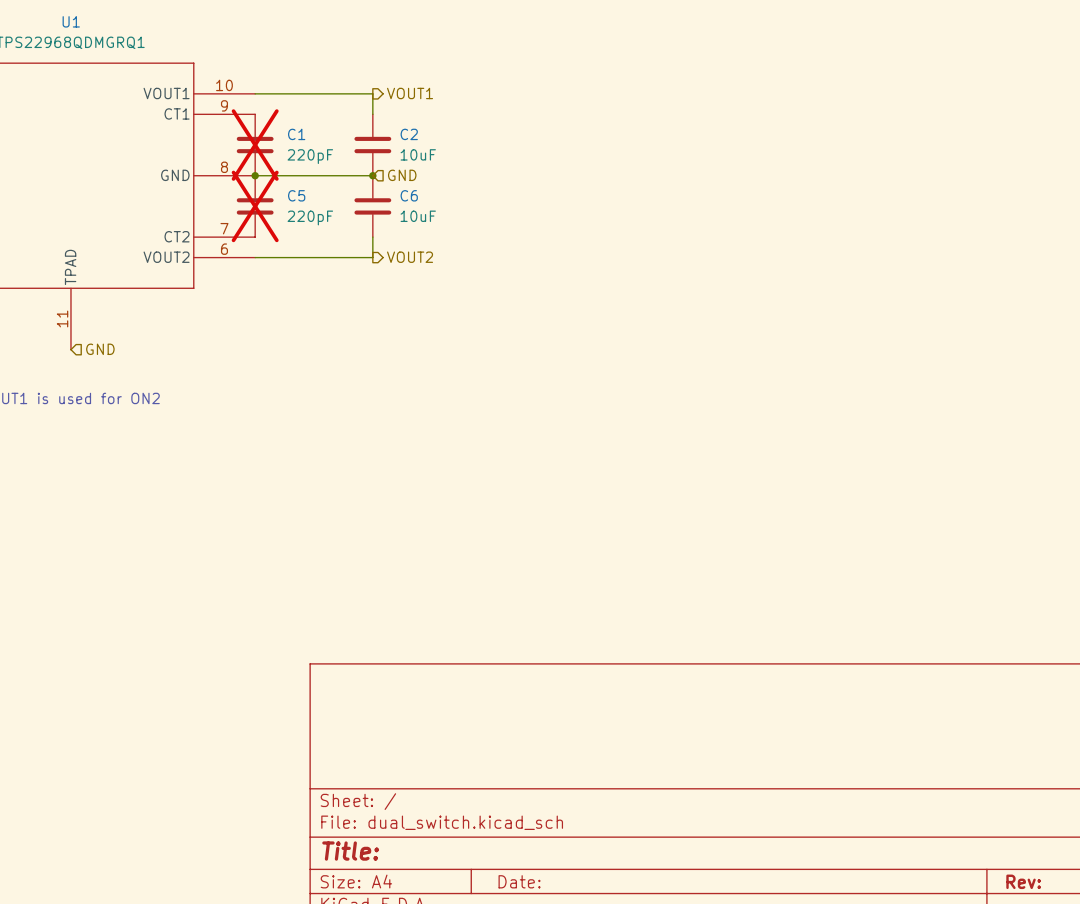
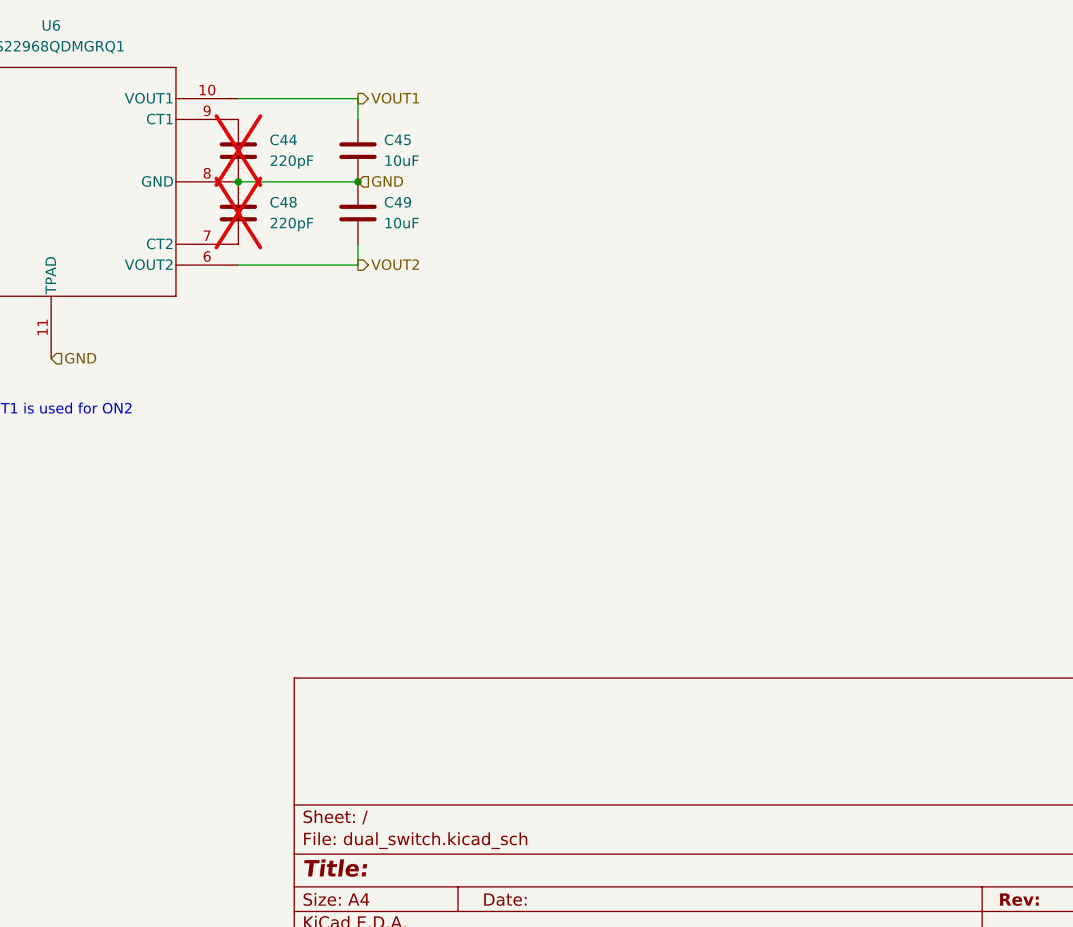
U1 name: U1 (71, 21) -> U6 (51, 25)
C1 name: C1 (296, 134) -> C44 (283, 139)
C2 name: C2 (409, 134) -> C45 (397, 139)
C5 name: C5 (296, 195) -> C48 (283, 202)
C6 name: C6 (409, 195) -> C49 (397, 202)

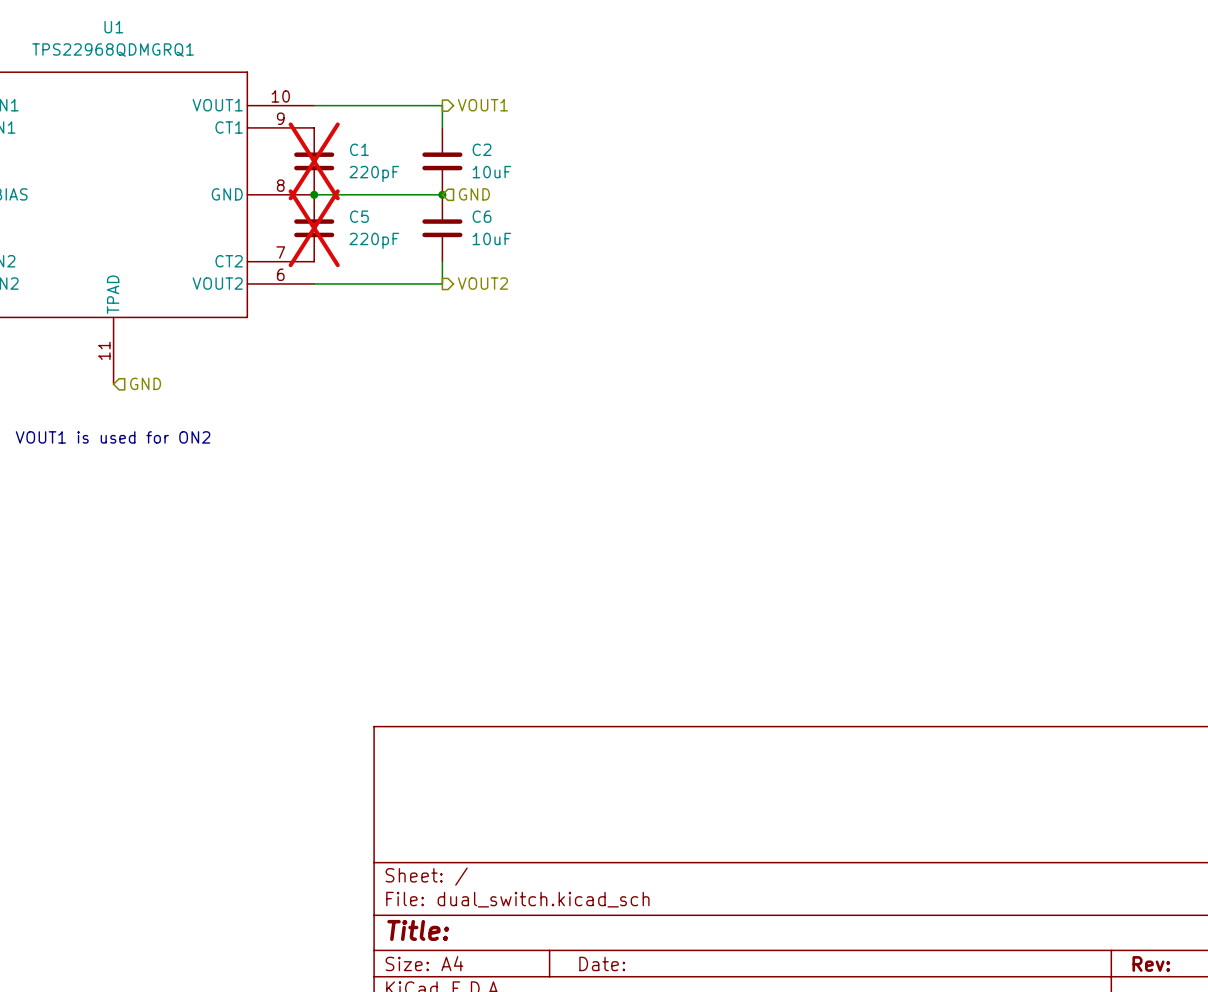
U6 name: U6 (51, 25) -> U1 (113, 27)
C44 name: C44 (283, 139) -> C1 (359, 149)
C45 name: C45 (397, 139) -> C2 (482, 149)
C48 name: C48 (283, 202) -> C5 (359, 216)
C49 name: C49 (397, 202) -> C6 (482, 216)

